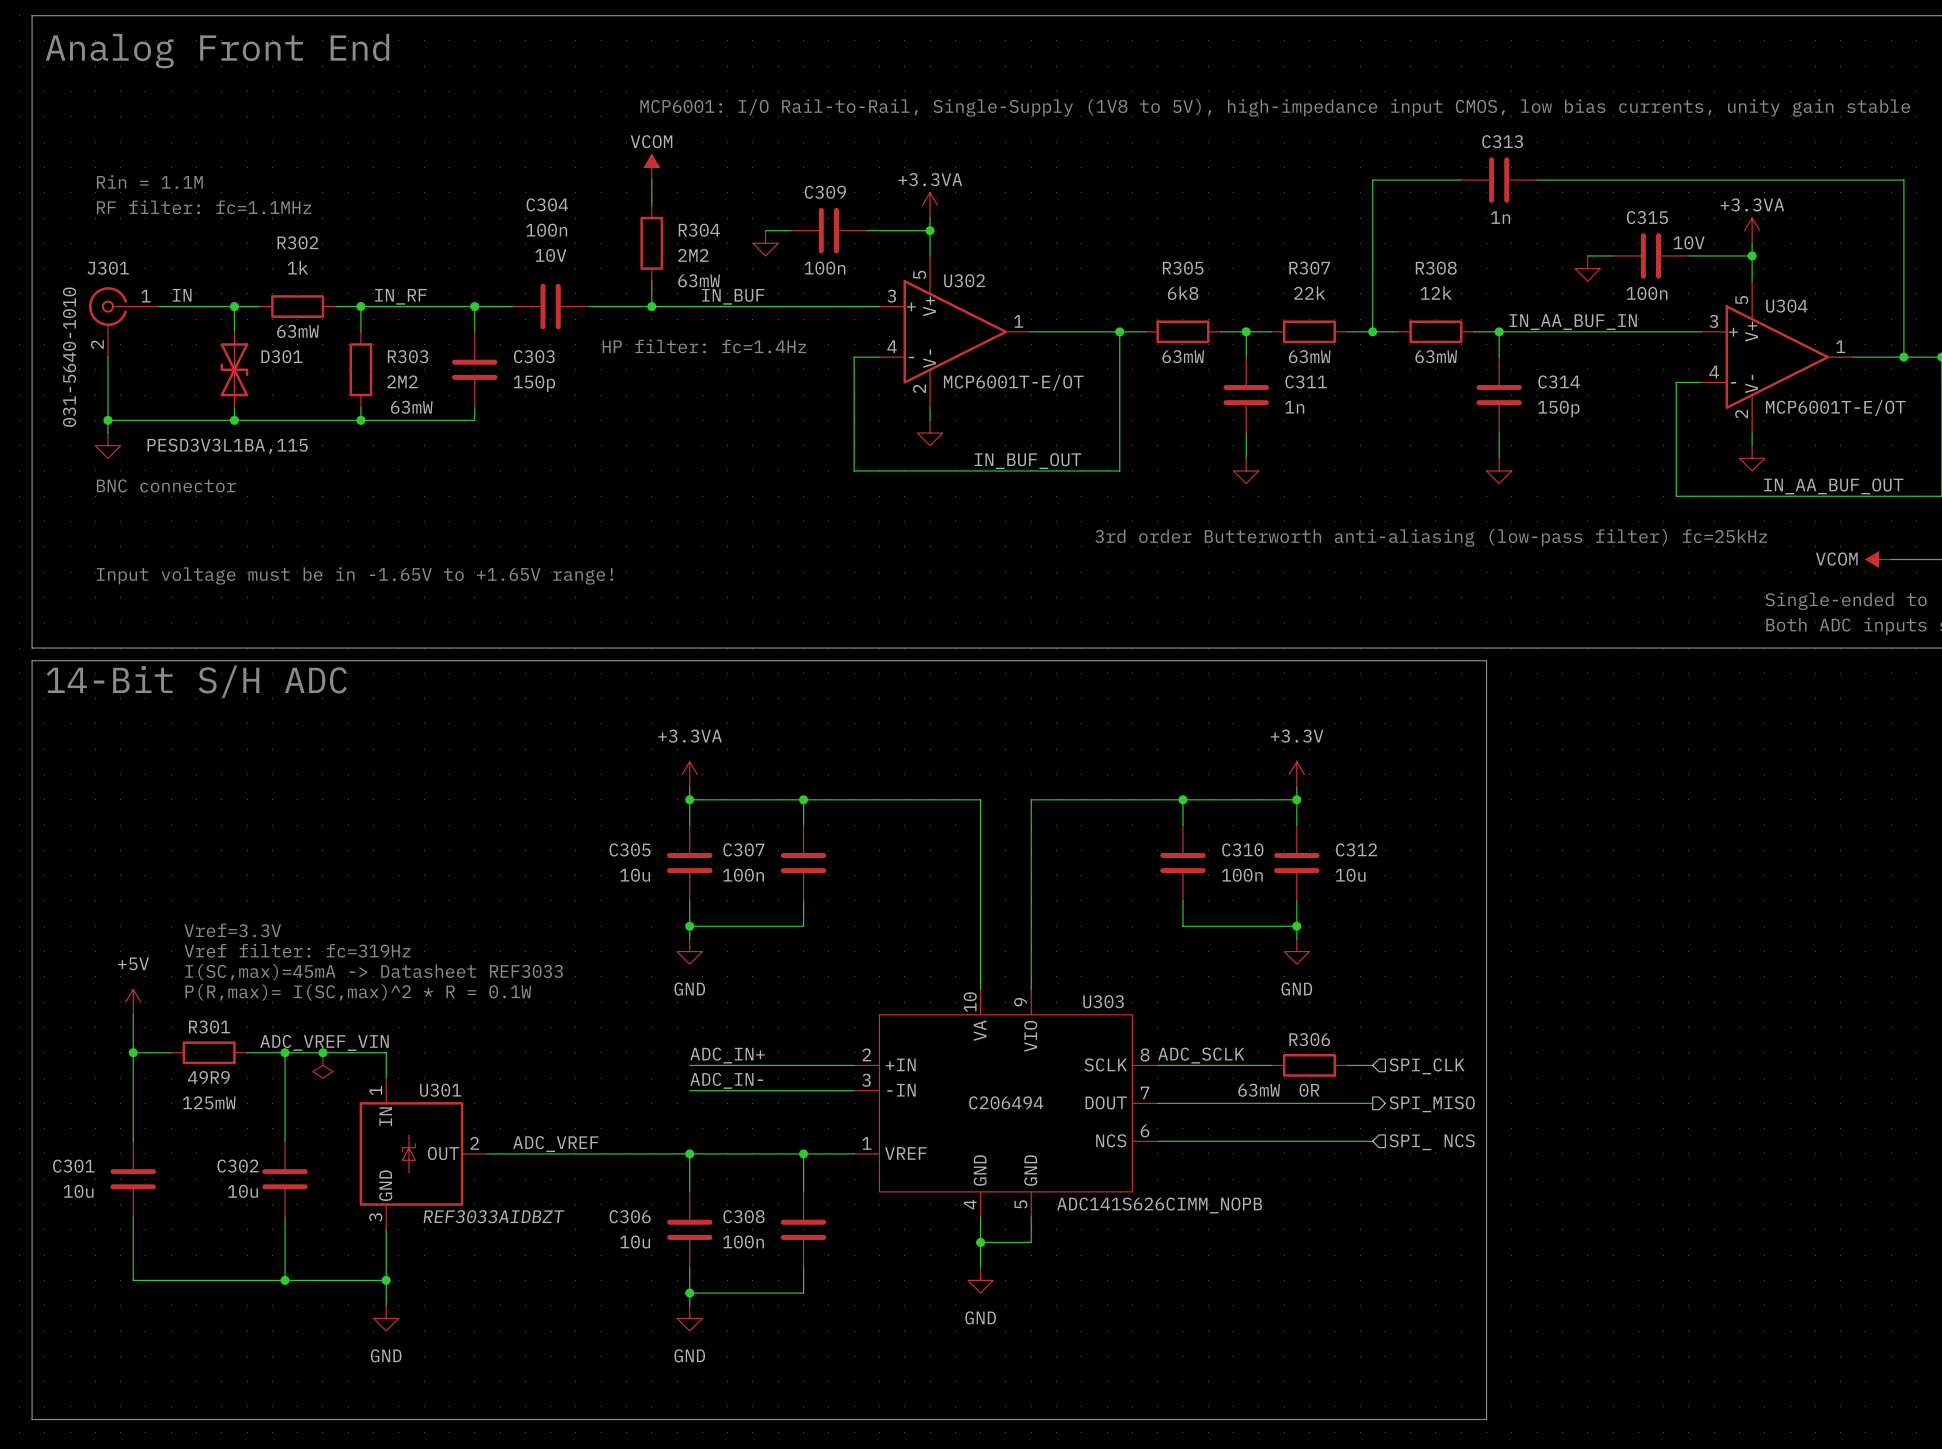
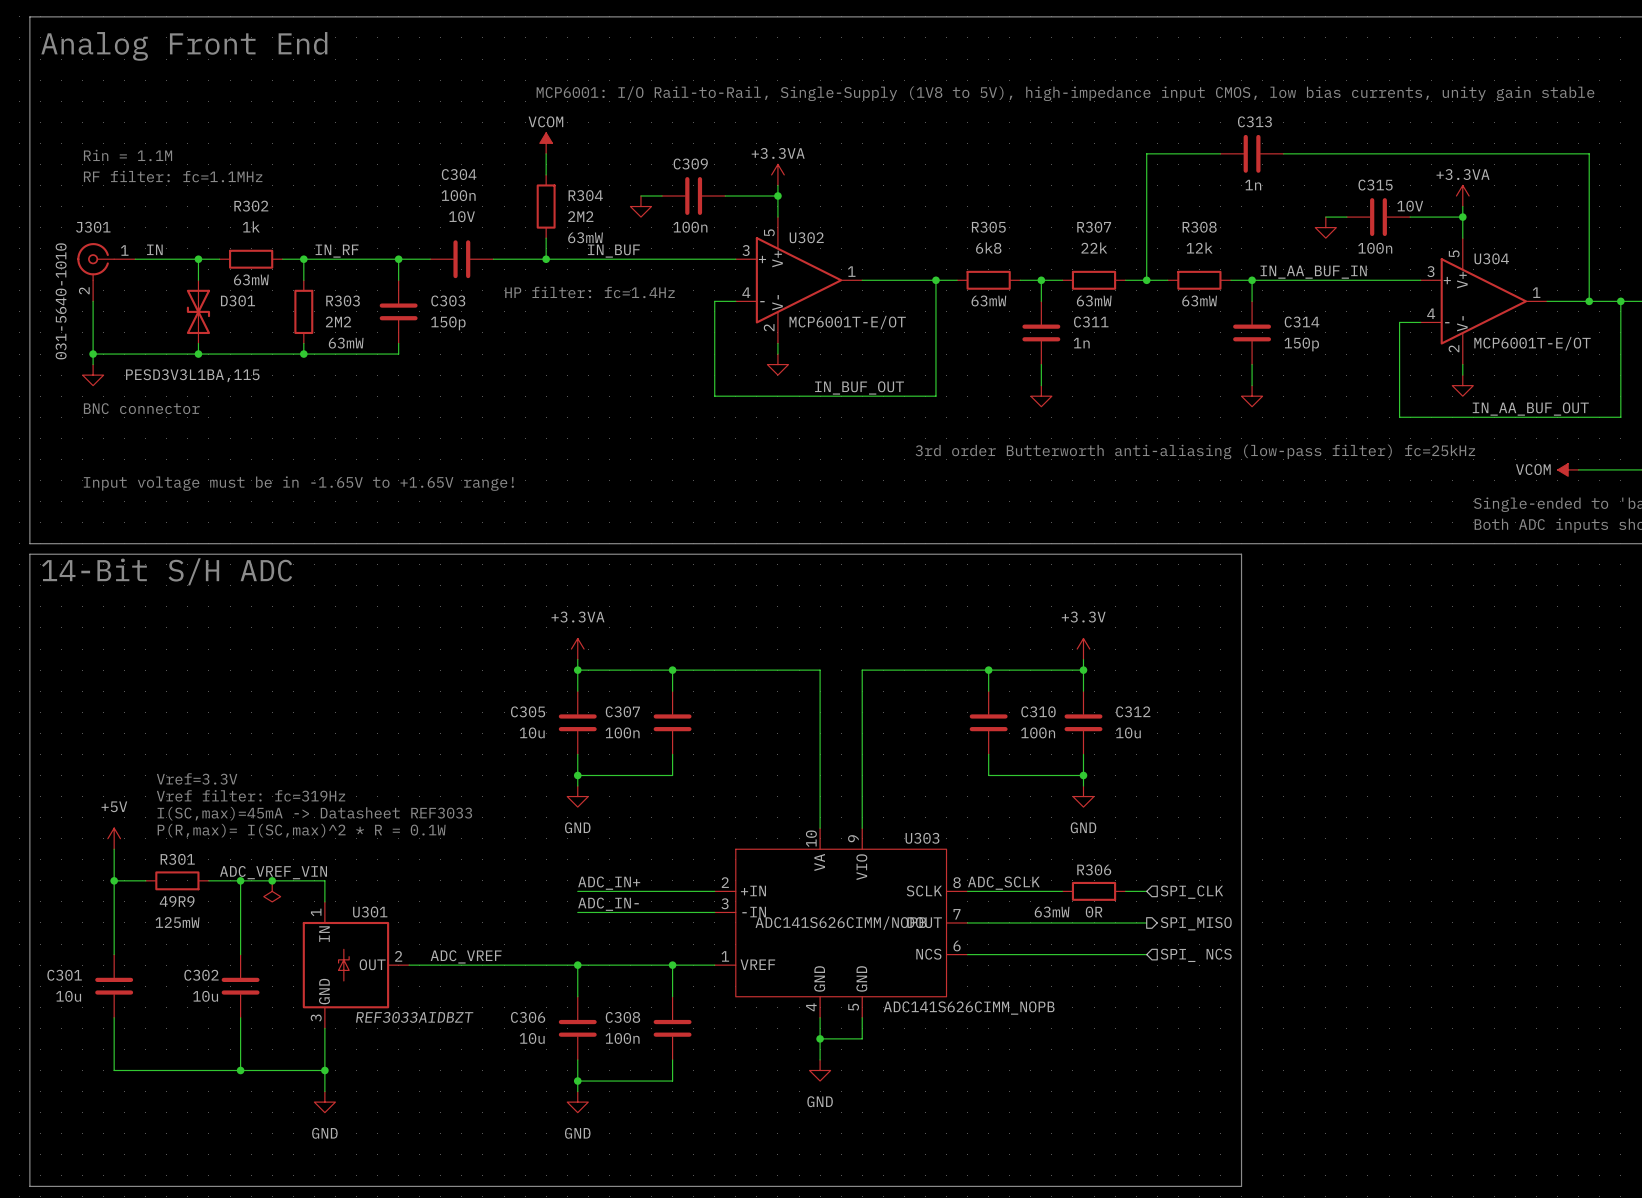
U303 text: C206494 (1006, 1102) -> ADC141S626CIMM/NOPB (840, 923)

